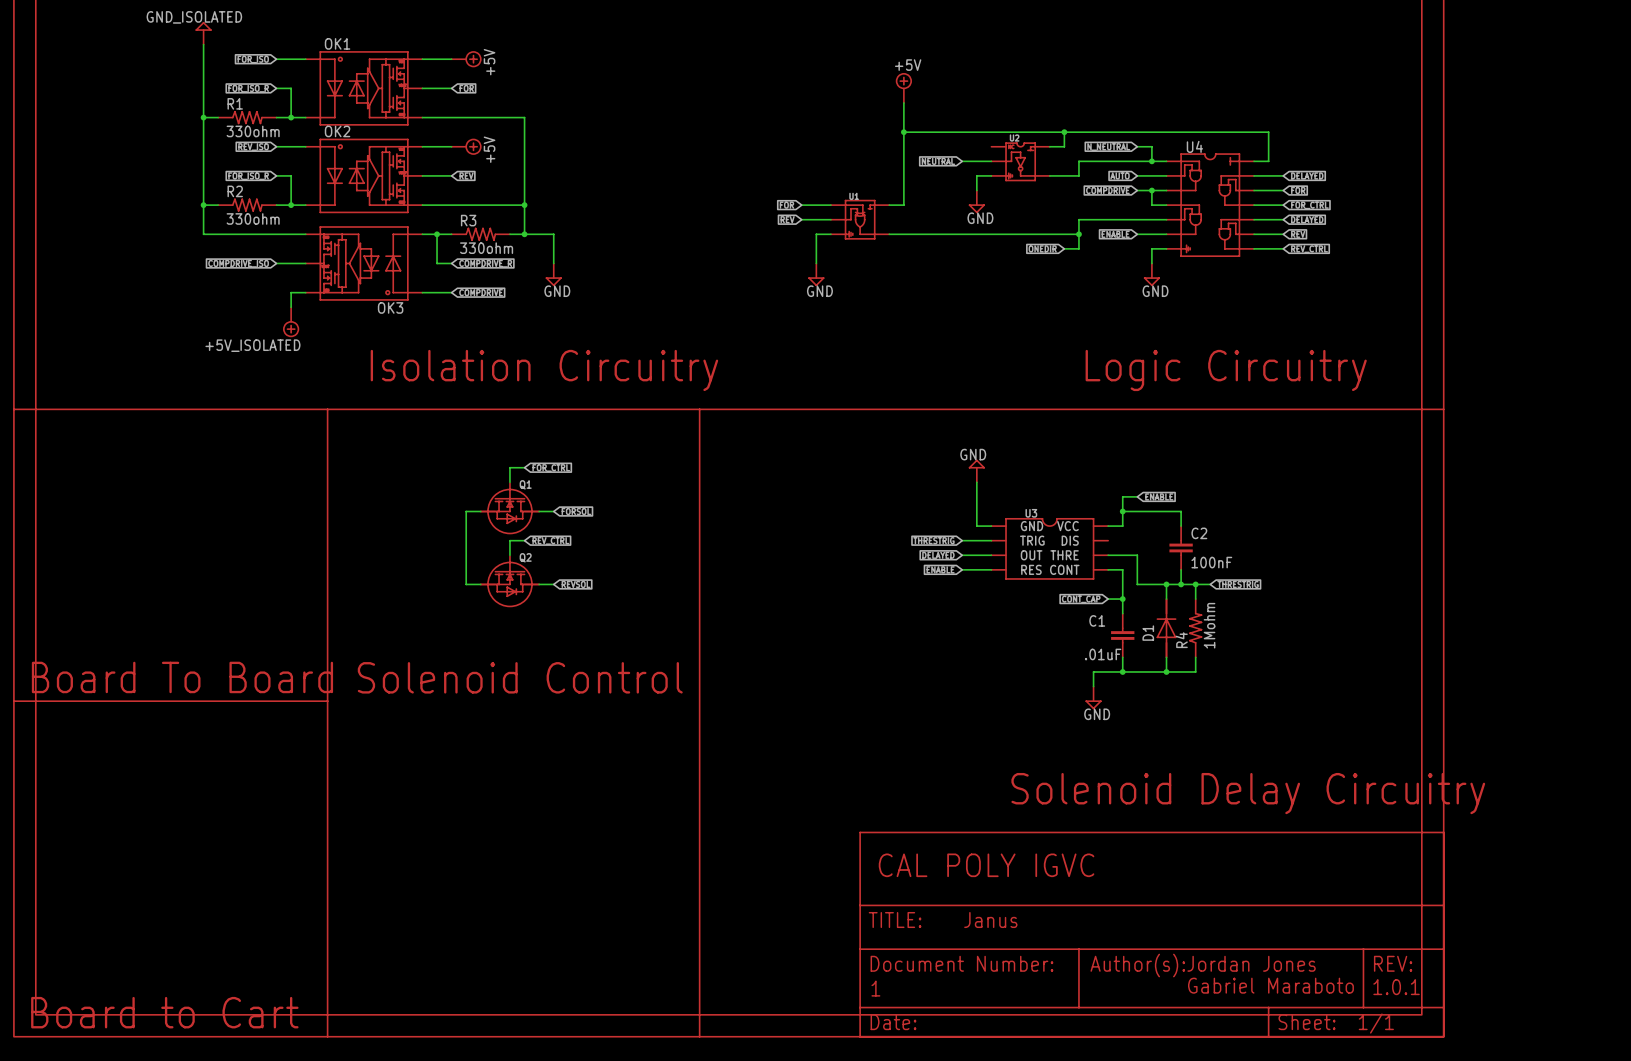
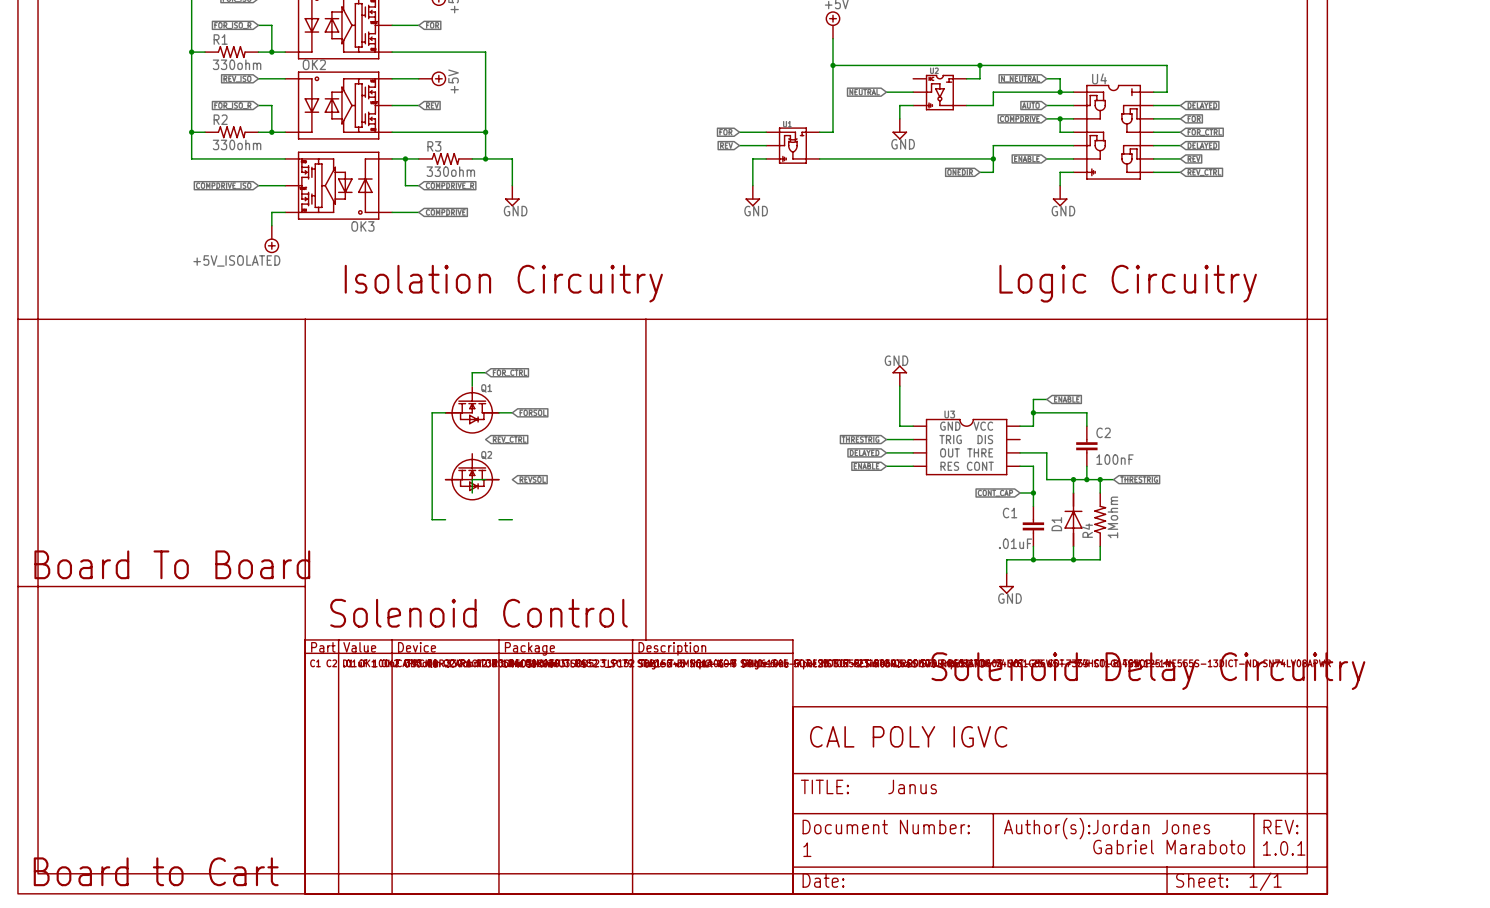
wire: (524, 540) (509, 540) (509, 555) -> (485, 479) (472, 479) (472, 493)
wire: (466, 584) (480, 584) -> (432, 479) (432, 519) (445, 519)
wire: (539, 584) (553, 584) -> (498, 519) (512, 519)
text position: Solenoid Control (520, 677) -> Solenoid Control (479, 613)
line: (699, 759) (699, 1036) -> none
part: none -> (549, 766)

